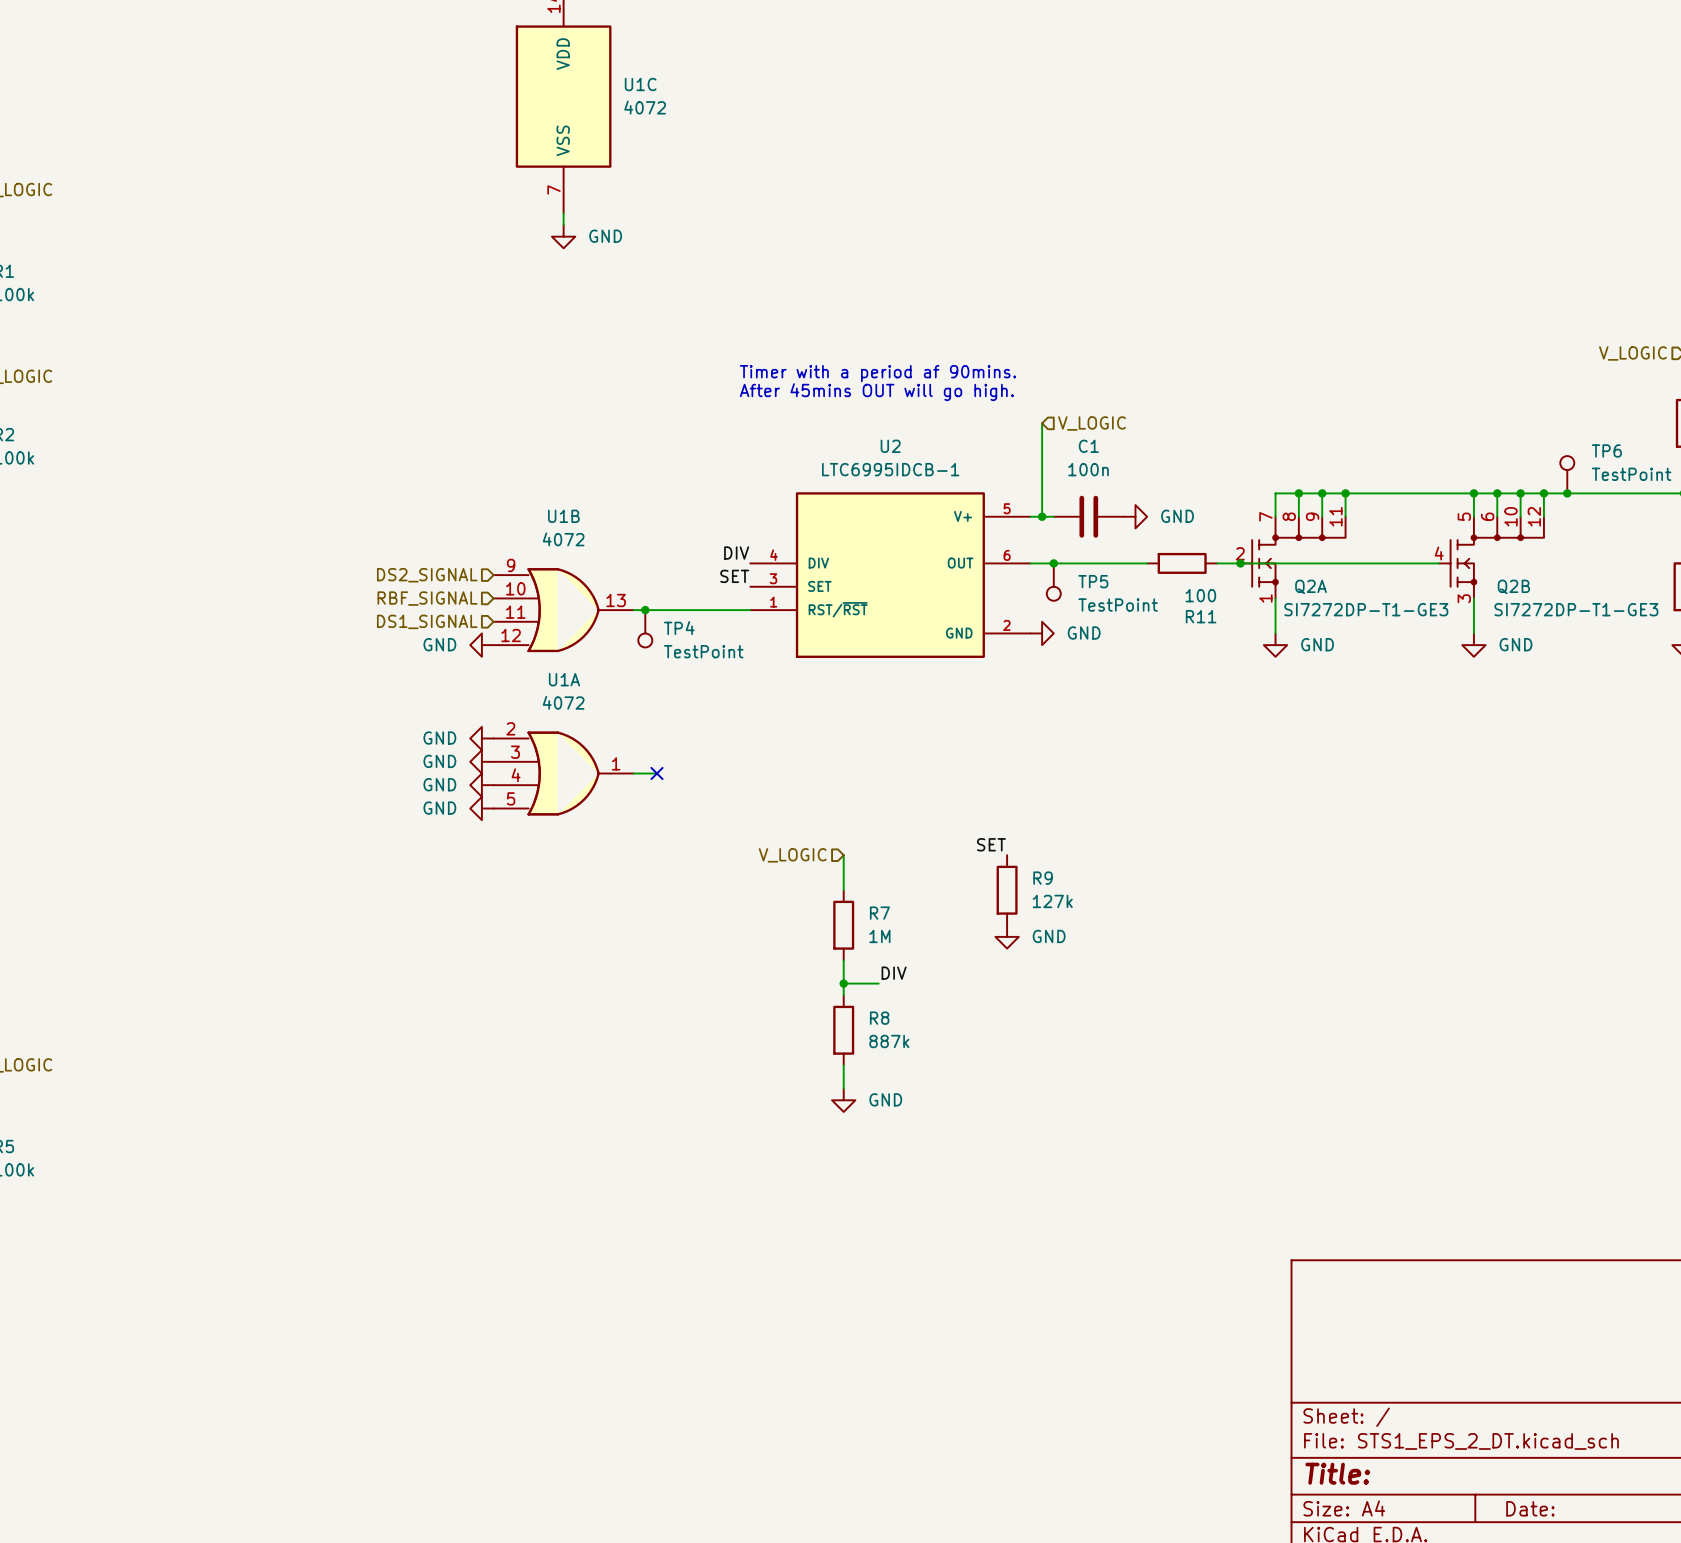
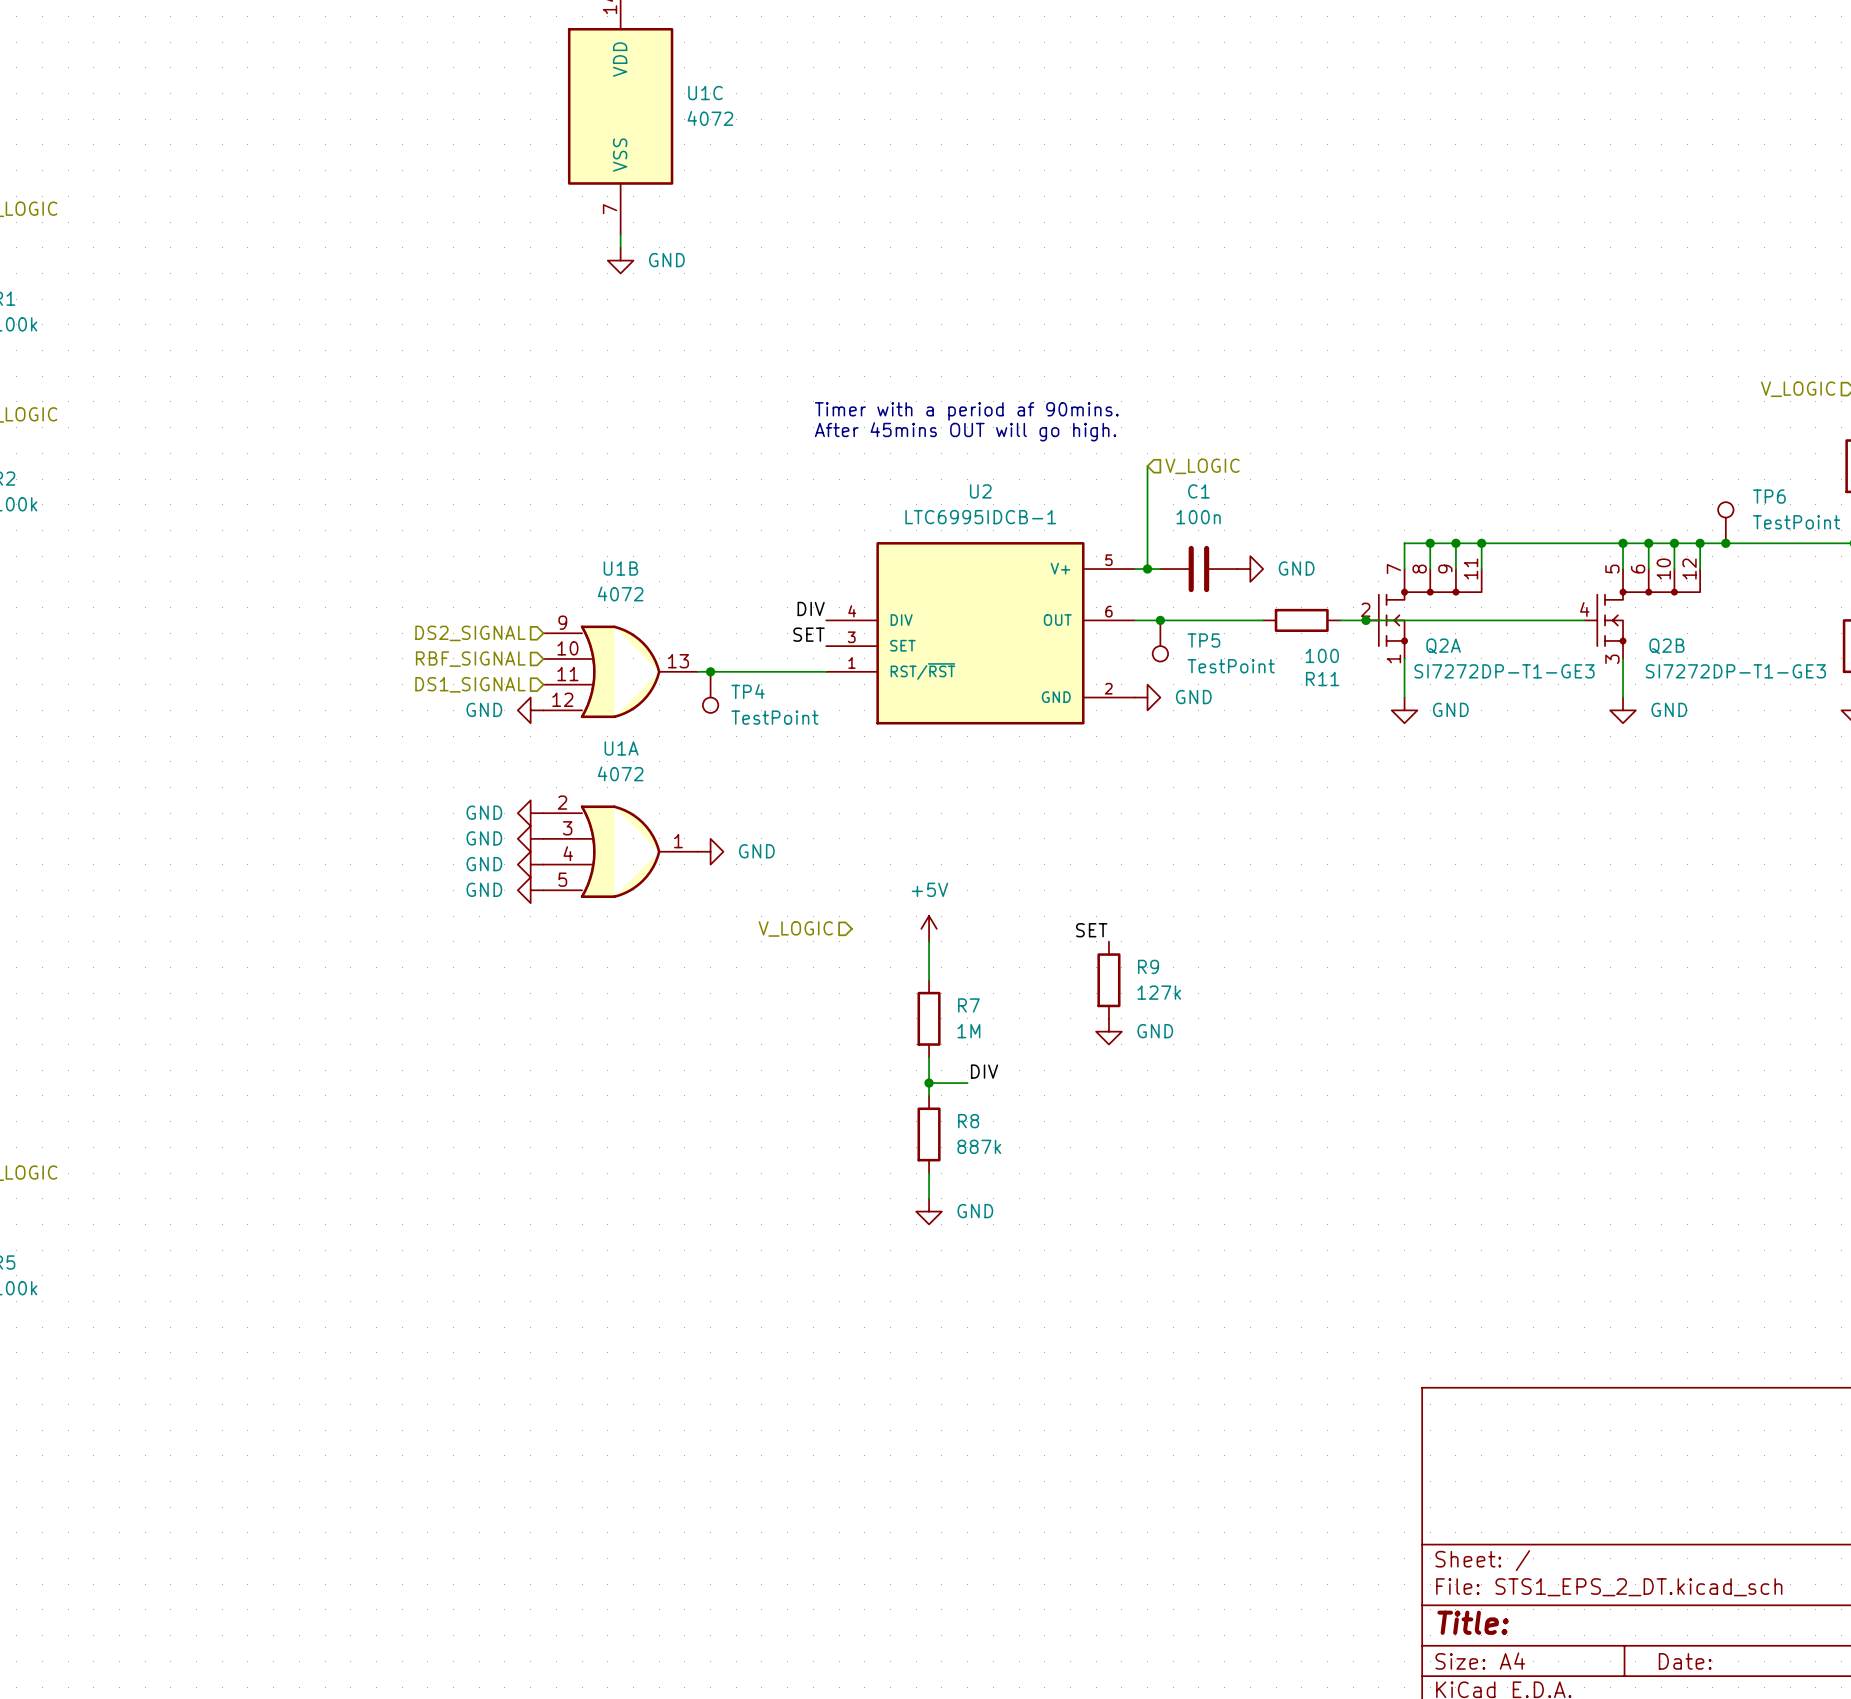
power symbol: none -> GND (710, 851)
no-connect mark: (656, 773) -> none
power symbol: none -> +5V (929, 928)
hierarchical label position: V_LOGIC (792, 855) -> V_LOGIC (795, 928)

